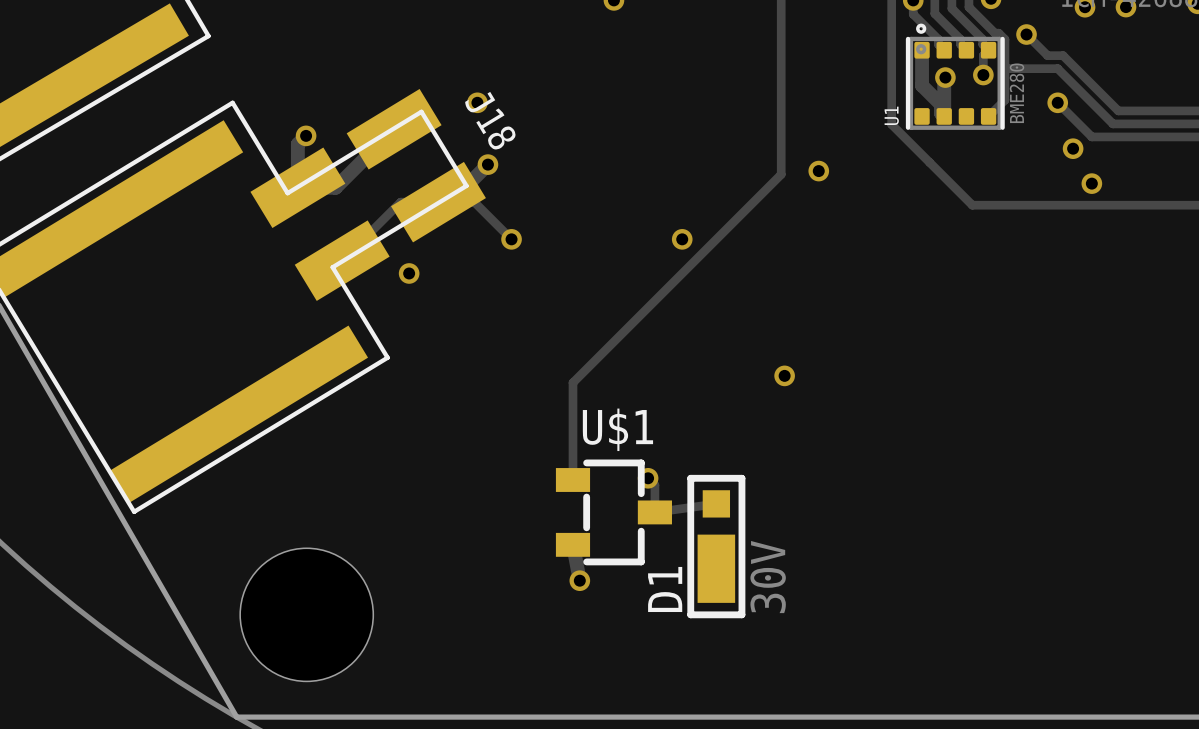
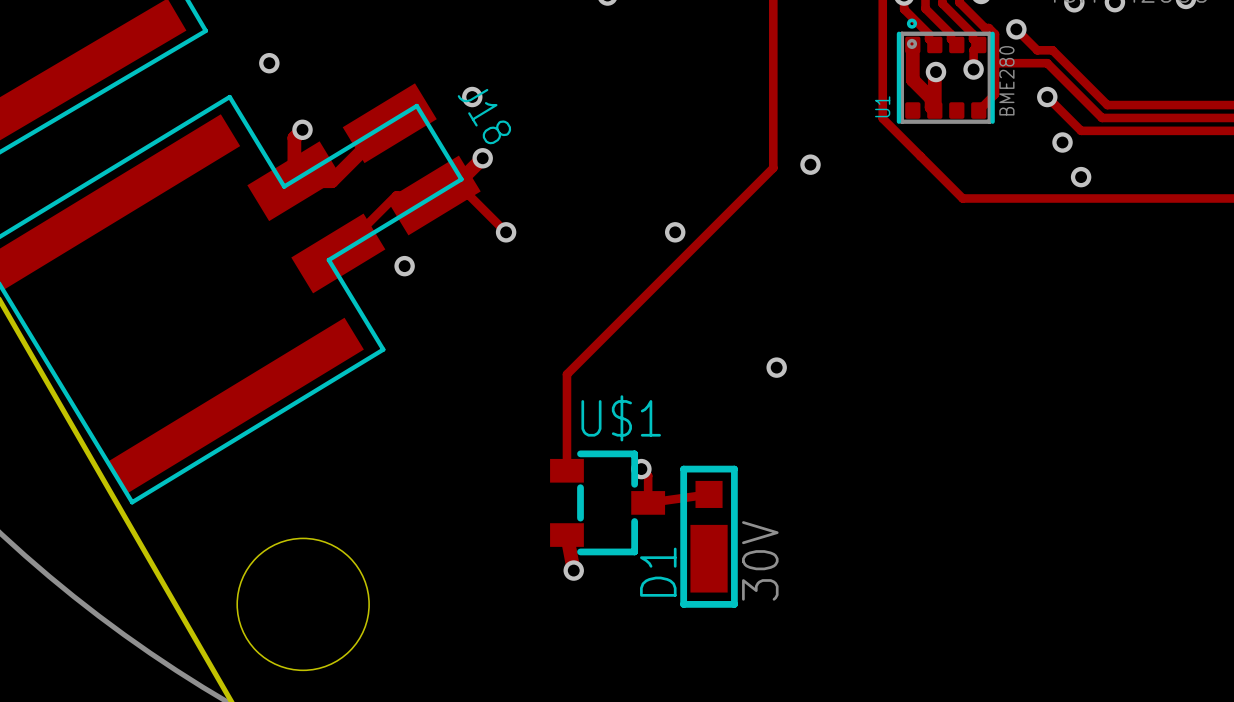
via: none -> (269, 63)

